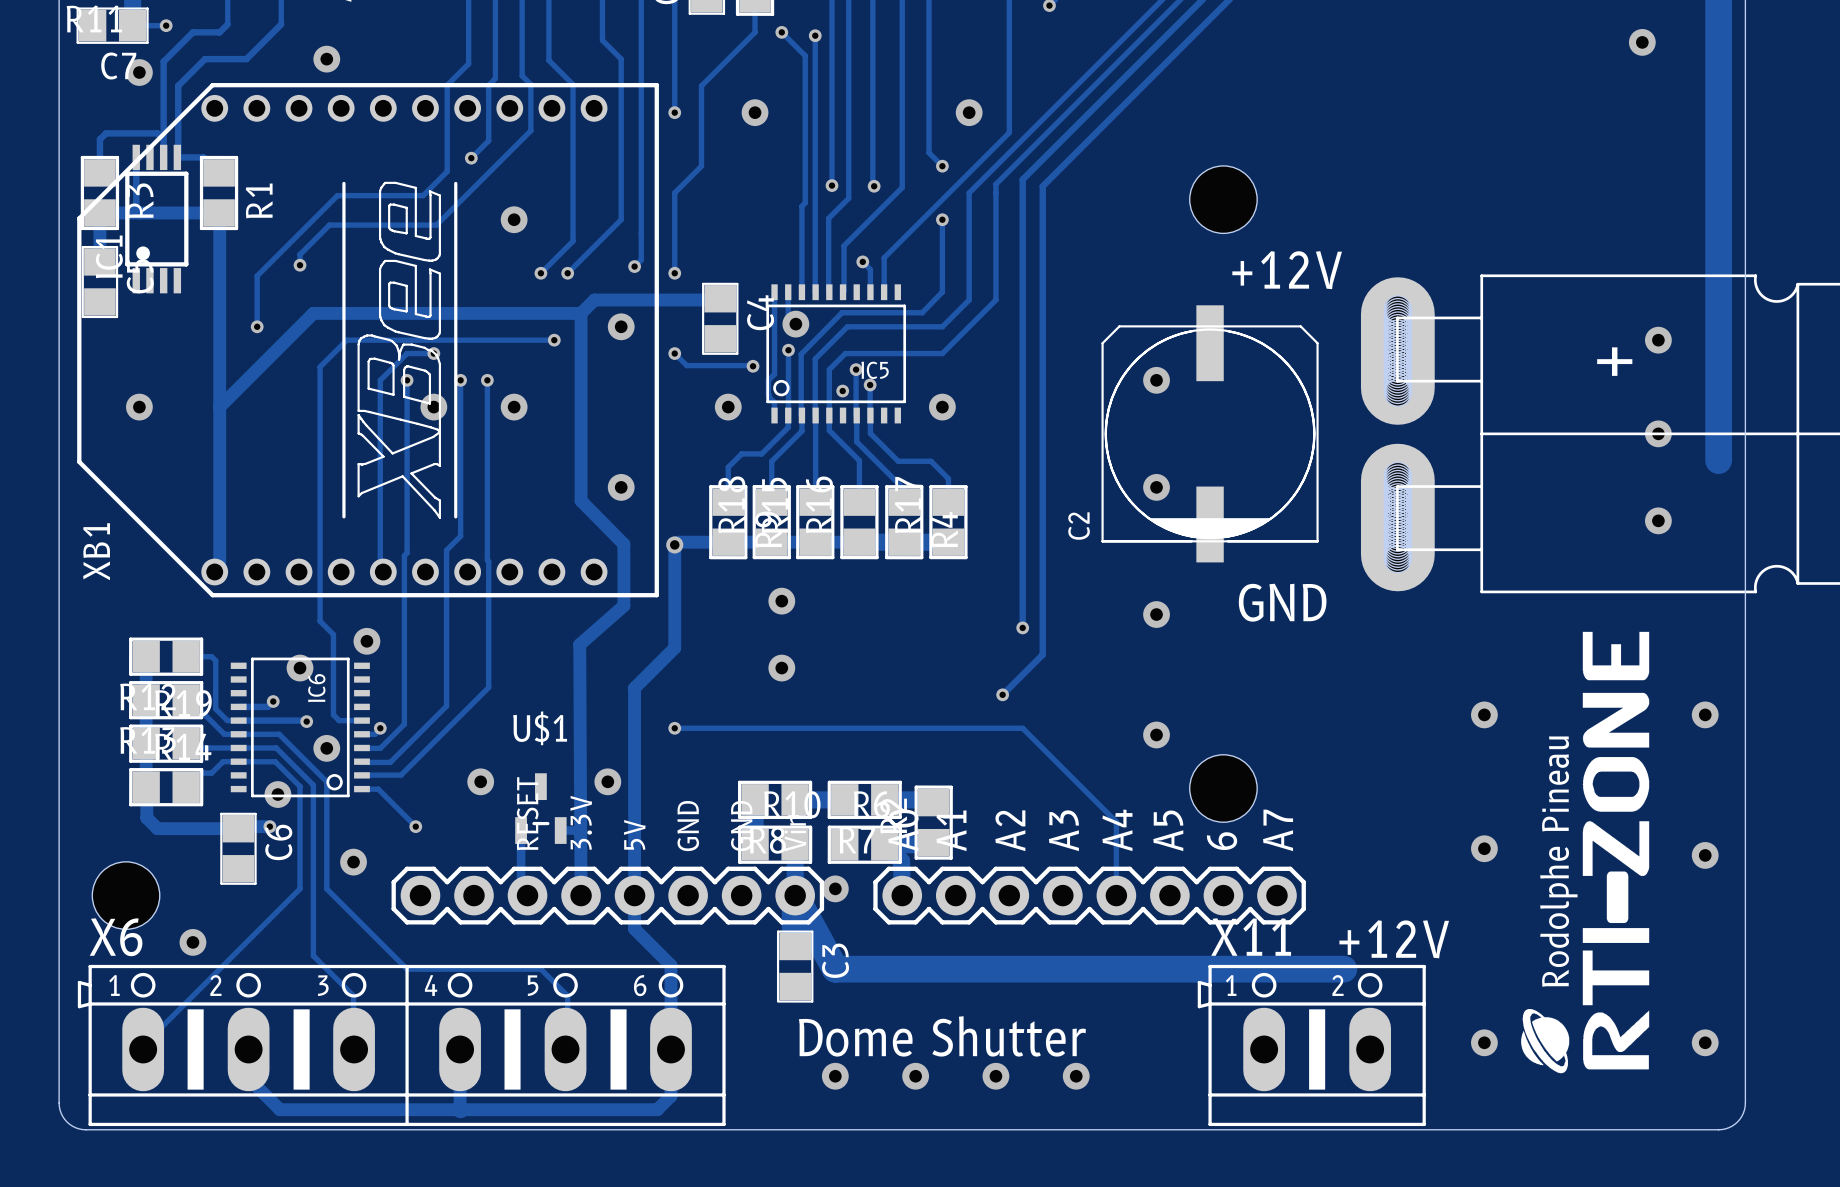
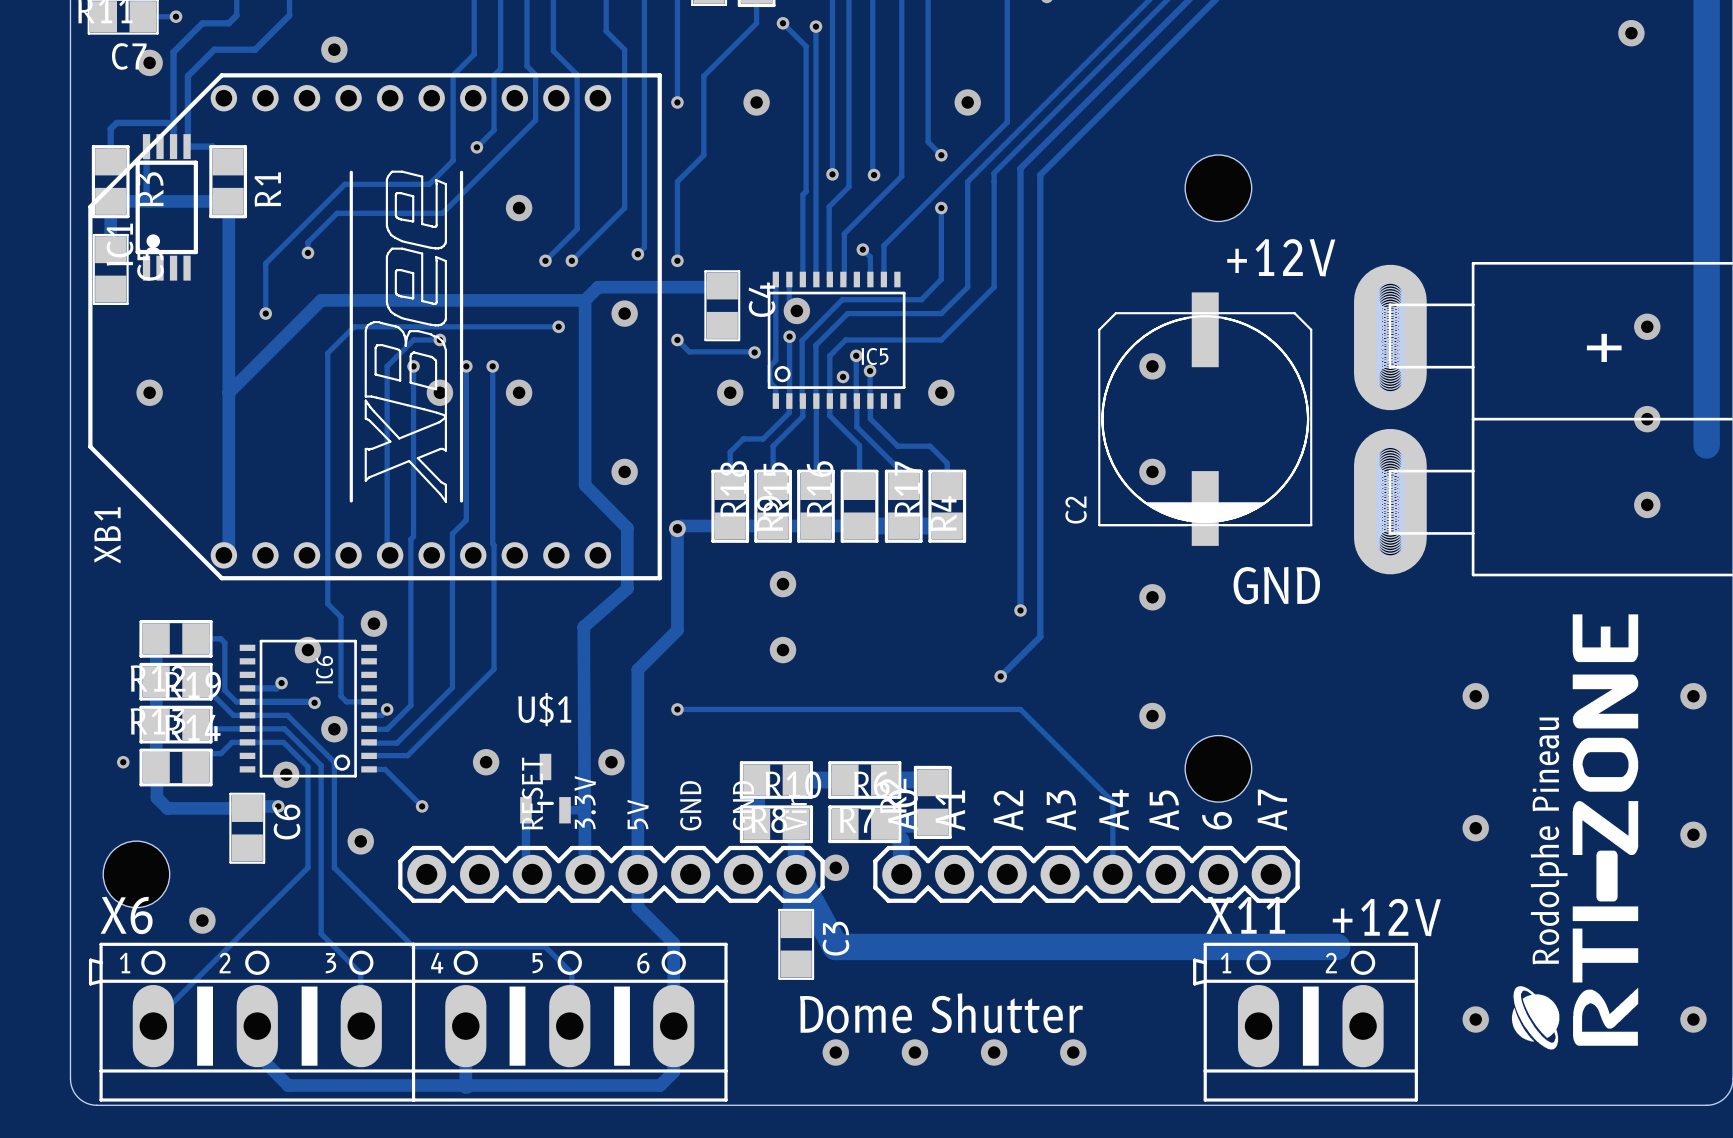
via: none -> (123, 762)

